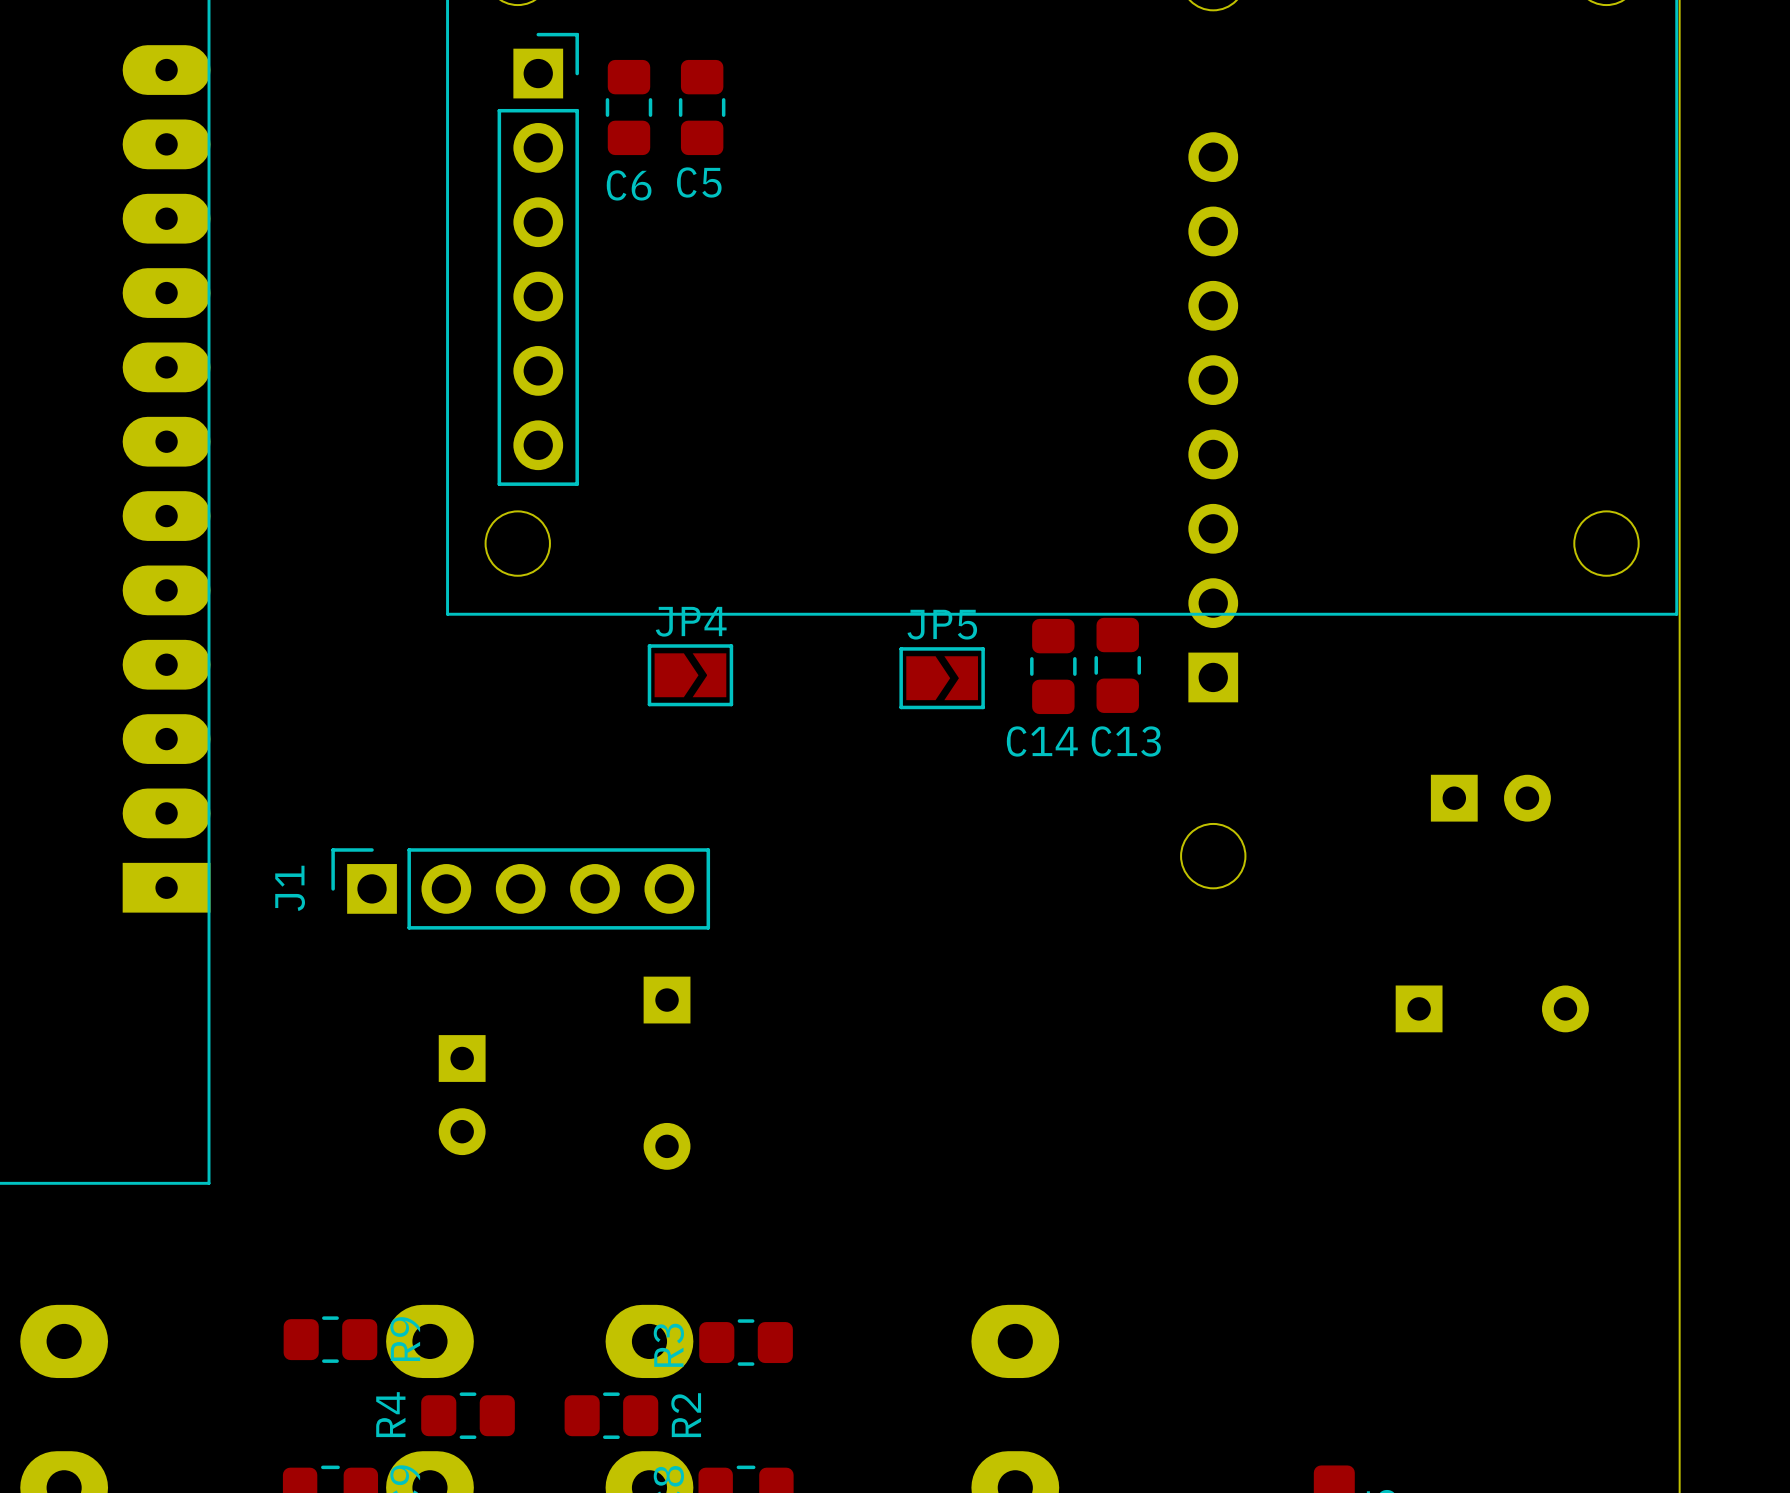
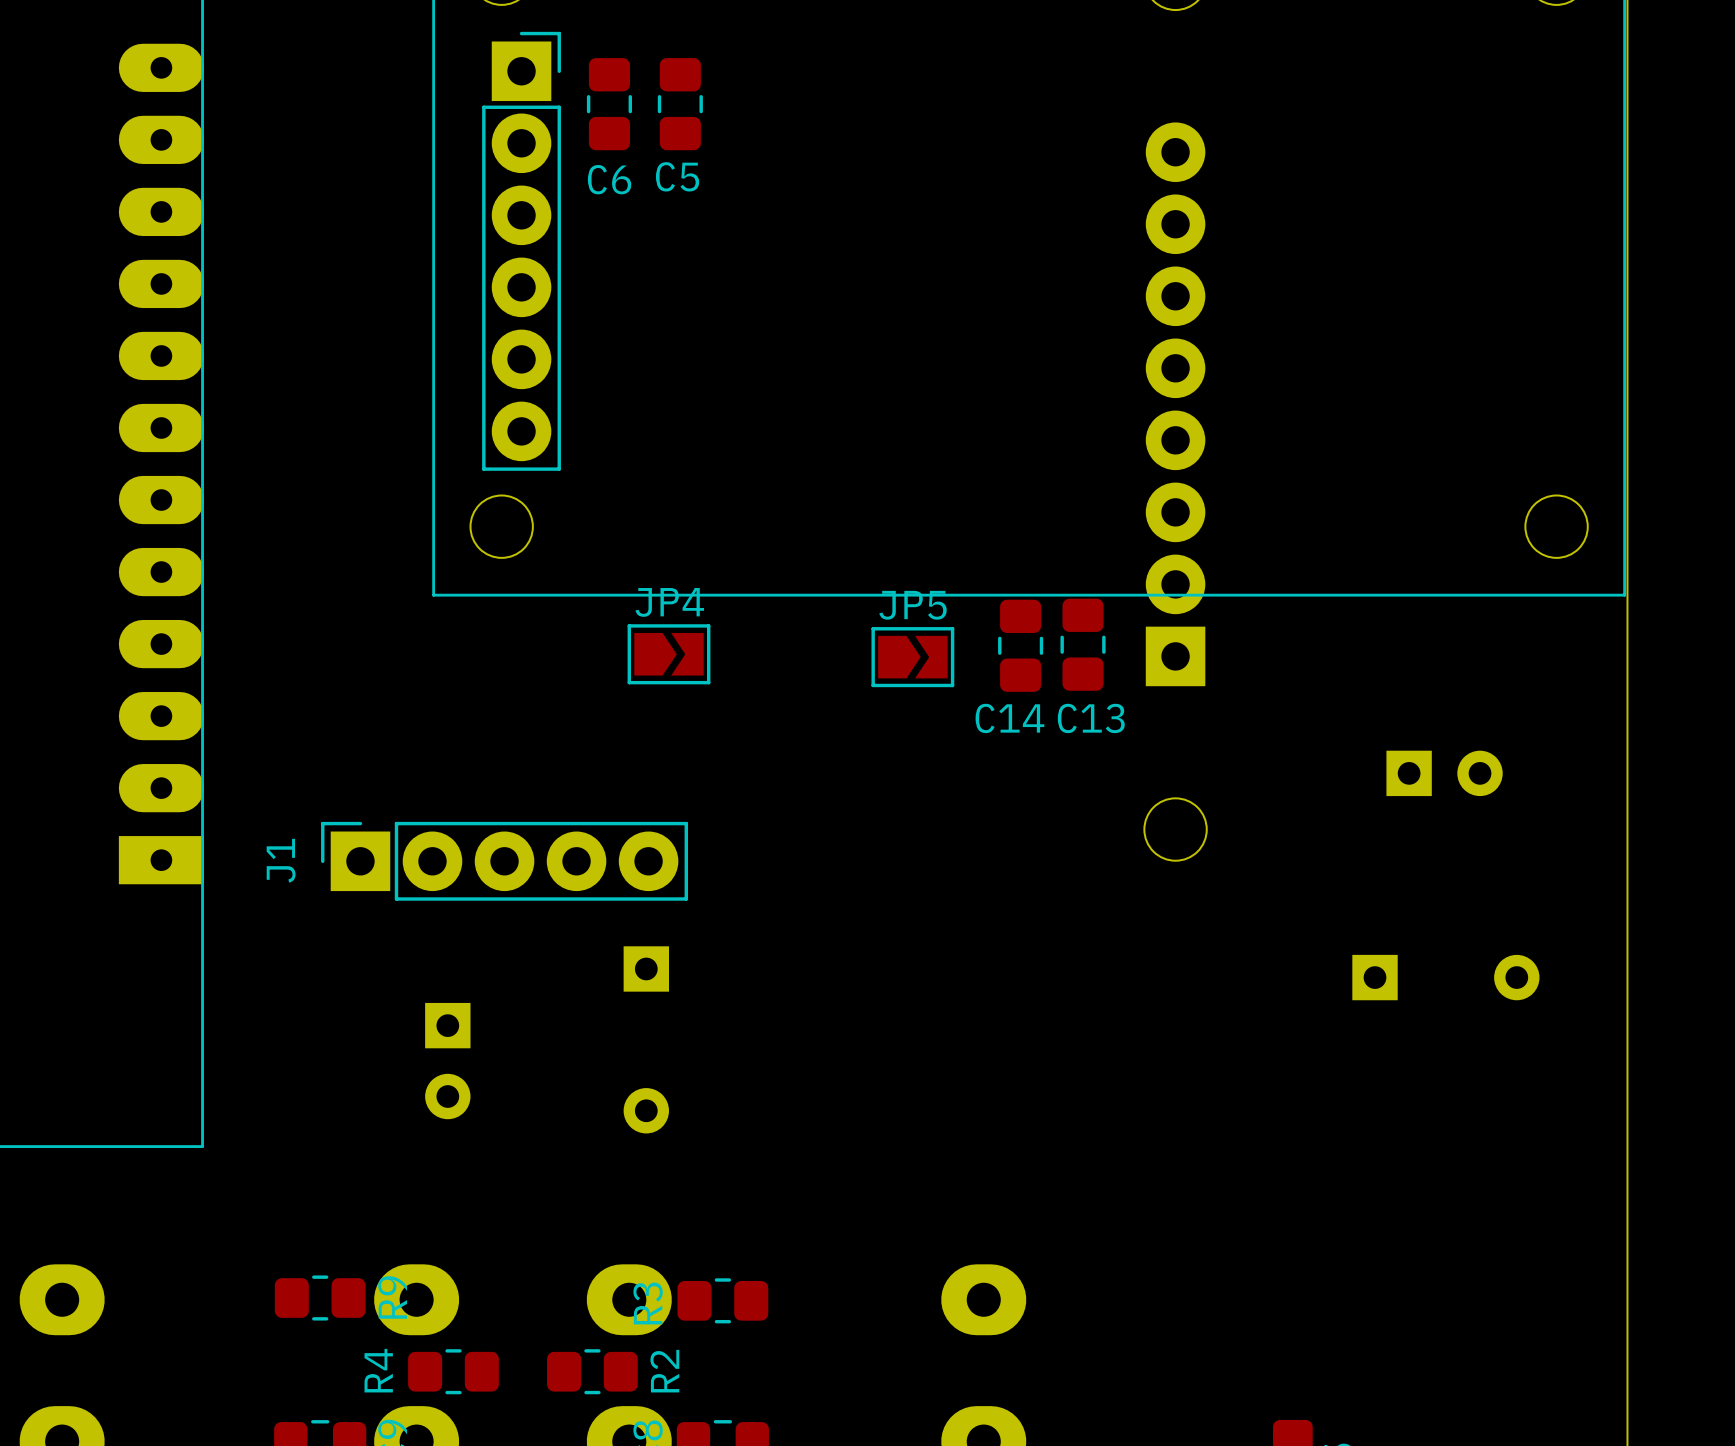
part footprint: [497, 32, 579, 486] -> [482, 31, 561, 471]
part footprint: [1188, 132, 1239, 703] -> [1145, 122, 1206, 687]
J1 footprint: [331, 848, 711, 930] -> [321, 821, 688, 901]

